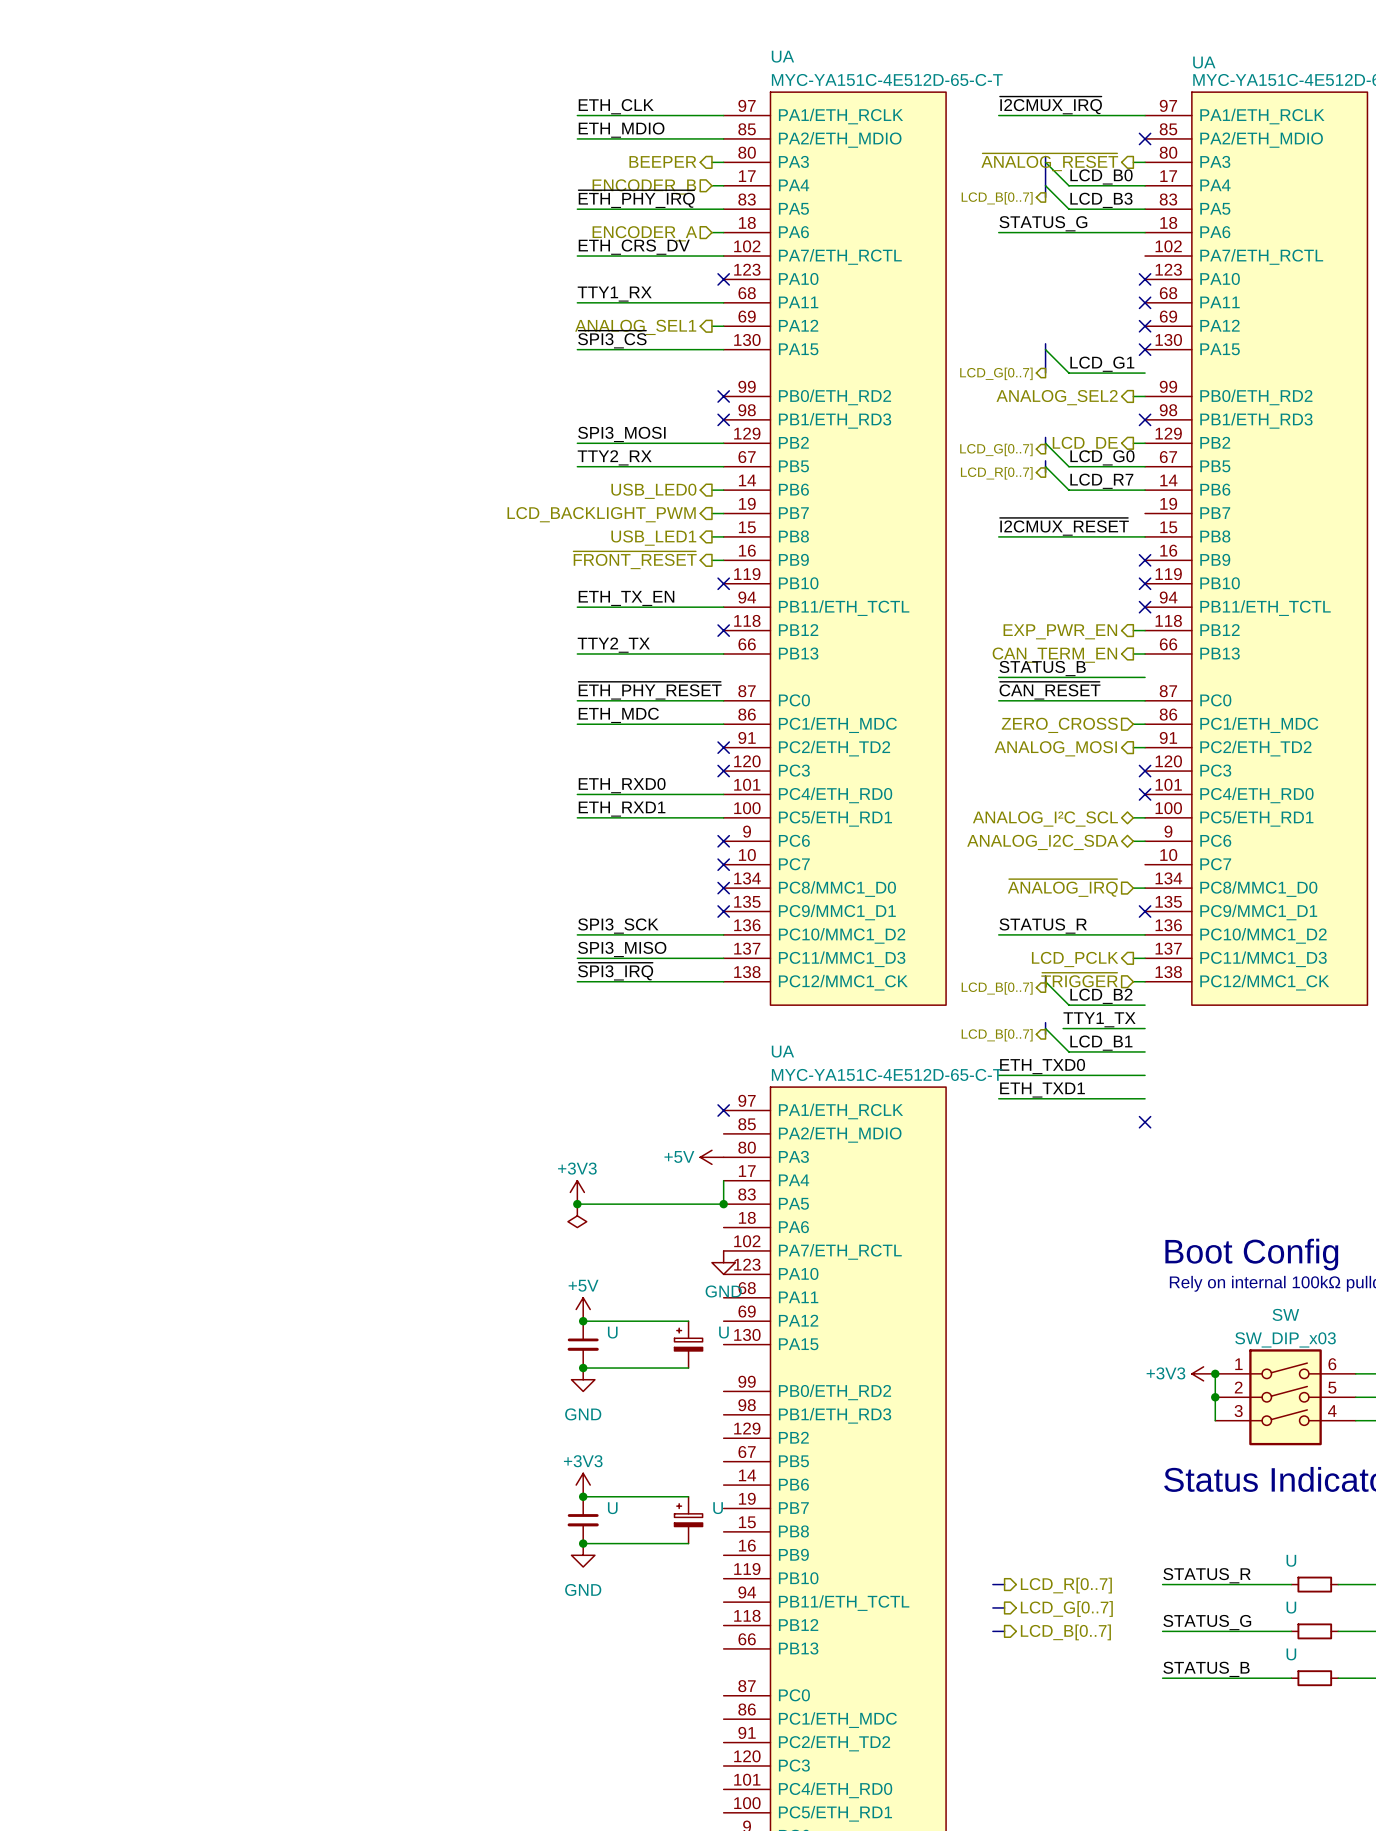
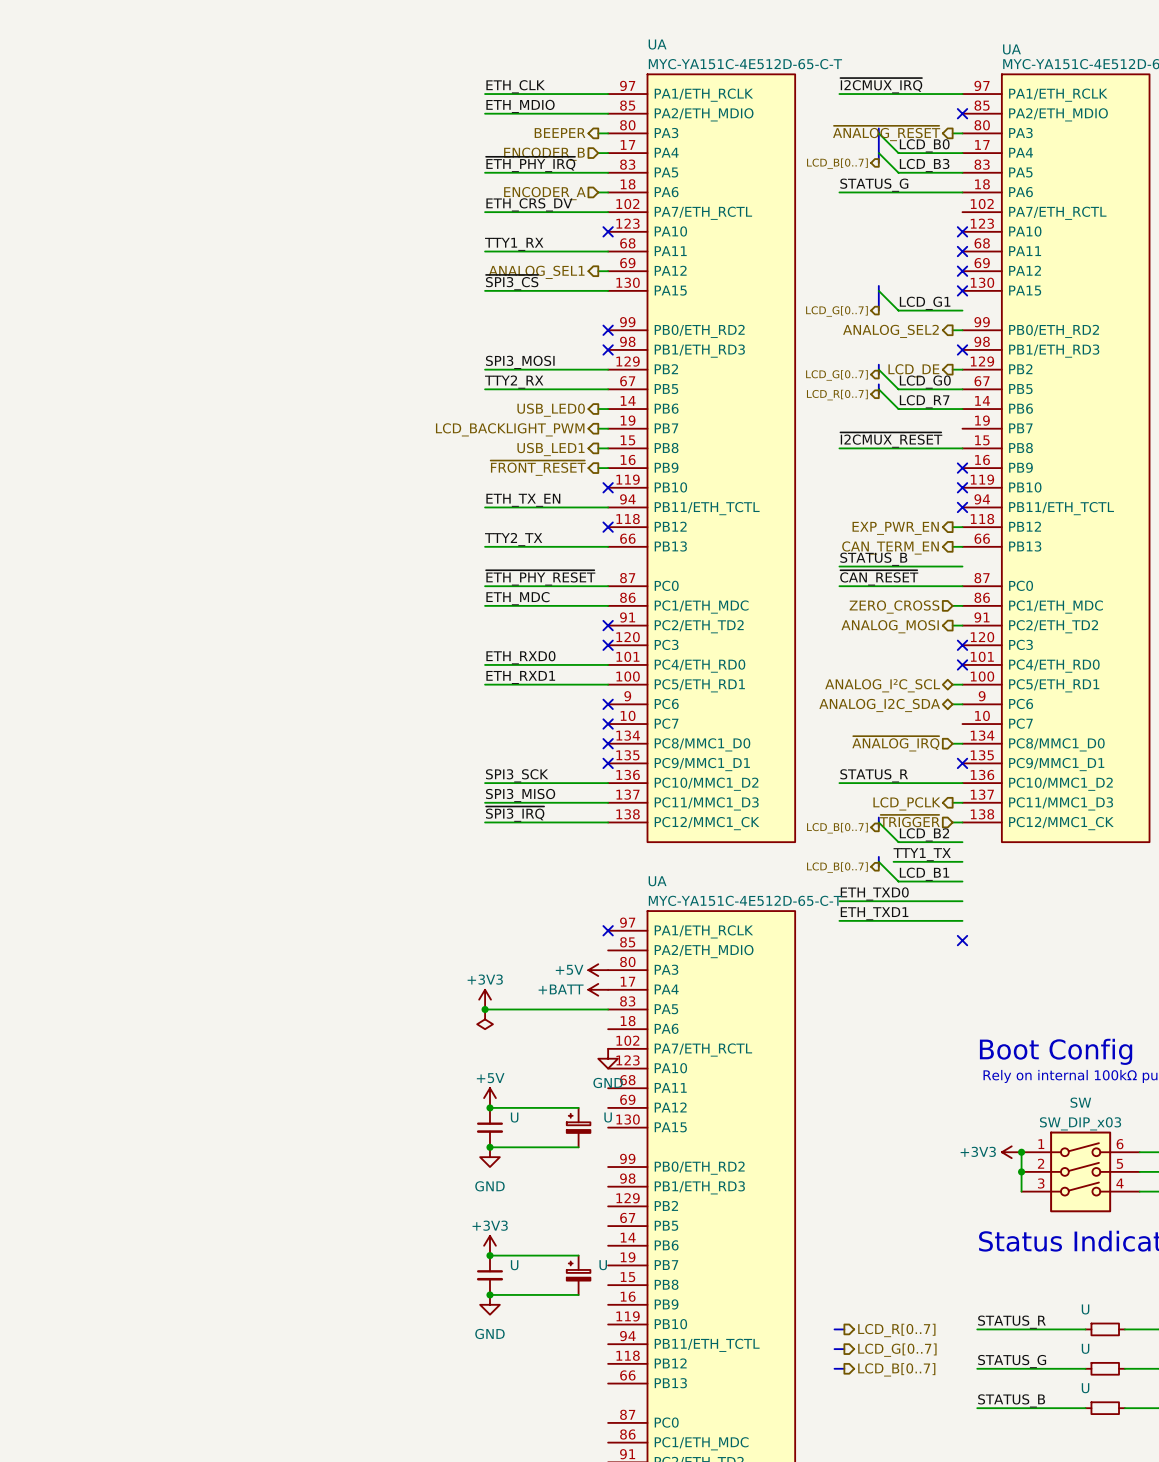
power symbol: none -> +BATT (598, 989)
wire: (723, 1180) (723, 1204) -> none
junction: (723, 1204) -> none

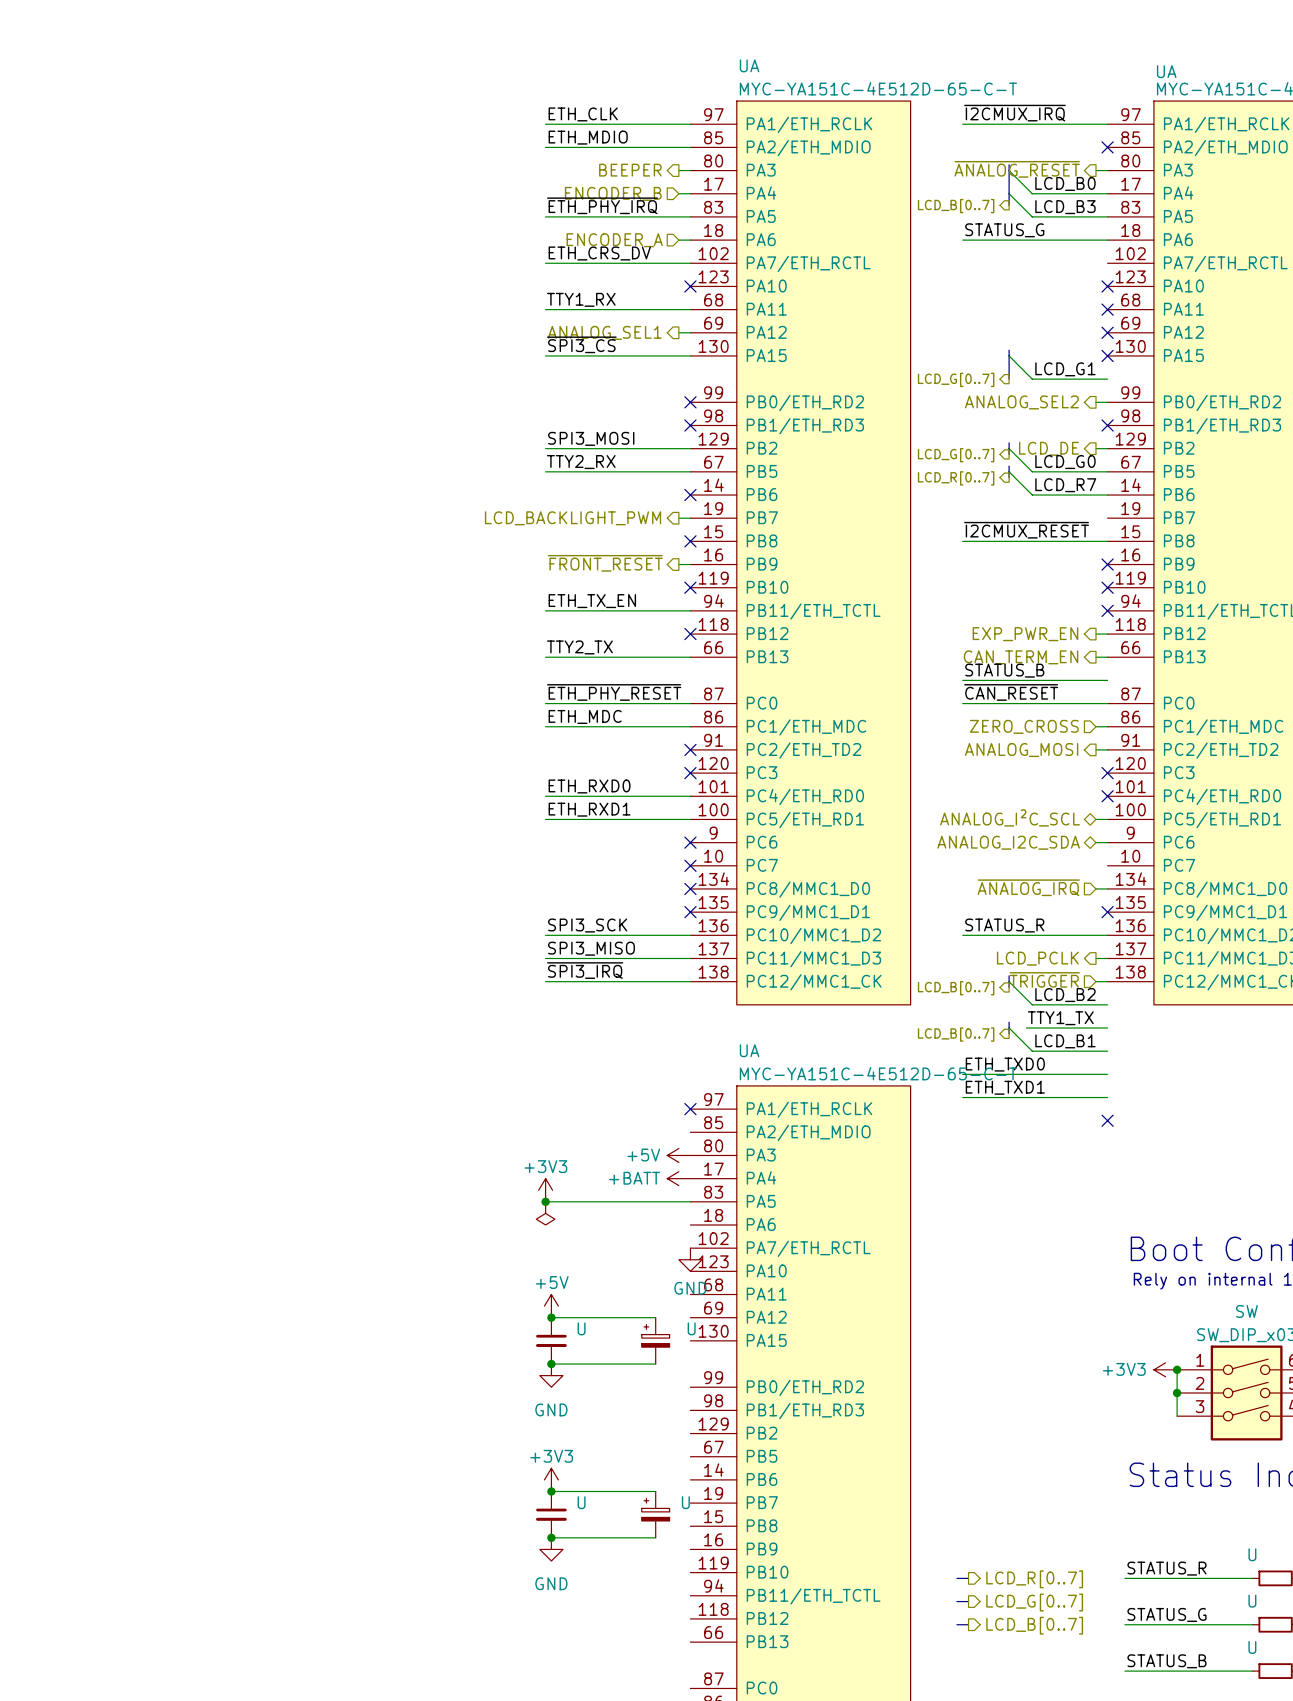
wire: (598, 409) (608, 409) -> none
no-connect mark: none -> (690, 495)
hierarchical label: USB_LED0 (551, 410) -> none
wire: (598, 448) (608, 448) -> none
no-connect mark: none -> (690, 541)
hierarchical label: USB_LED1 (550, 449) -> none

